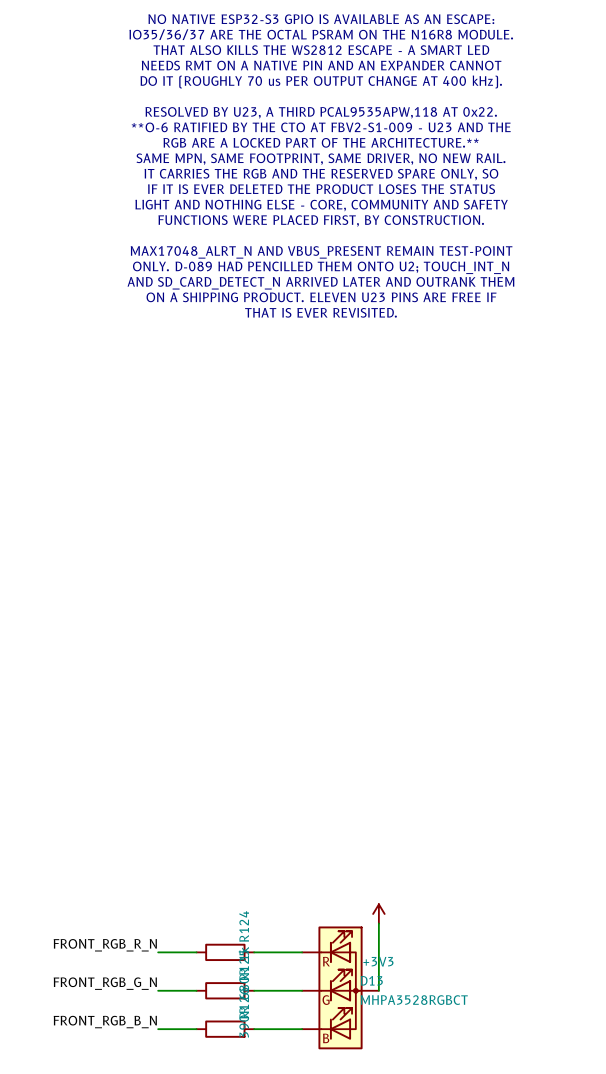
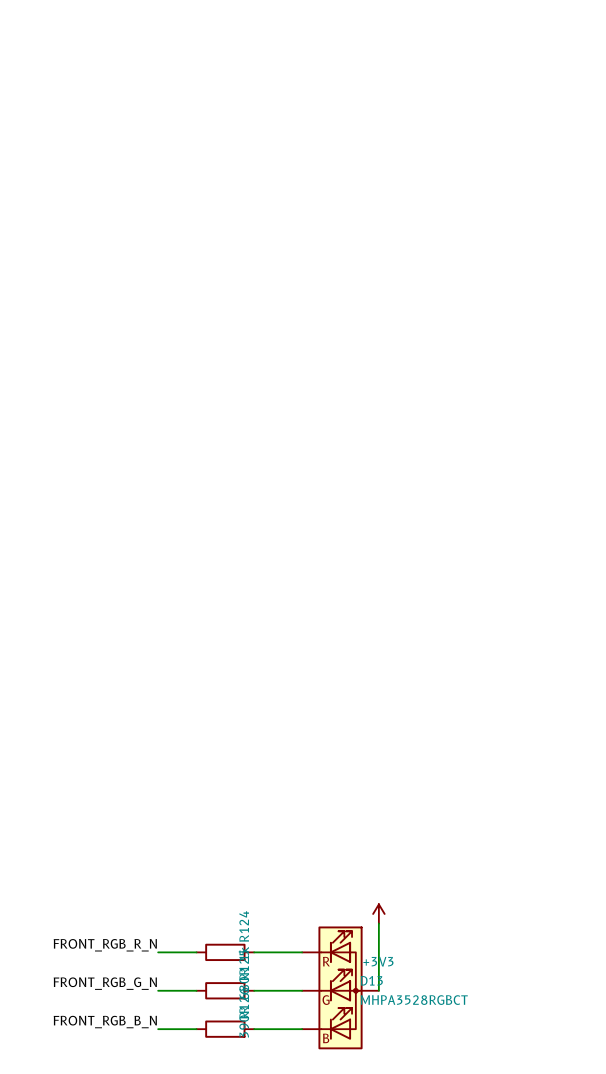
text: NO NATIVE ESP32-S3 GPIO IS AVAILABLE AS AN ESCAPE: (321, 19) -> none
text: IO35/36/37 ARE THE OCTAL PSRAM ON THE N16R8 MODULE. (321, 34) -> none
text: THAT ALSO KILLS THE WS2812 ESCAPE - A SMART LED (321, 50) -> none
text: NEEDS RMT ON A NATIVE PIN AND AN EXPANDER CANNOT (321, 65) -> none
text: DO IT (ROUGHLY 70 us PER OUTPUT CHANGE AT 400 kHz). (321, 81) -> none
text: RESOLVED BY U23, A THIRD PCAL9535APW,118 AT 0x22. (321, 112) -> none
text: **O-6 RATIFIED BY THE CTO AT FBV2-S1-009 - U23 AND THE (321, 127) -> none
text: RGB ARE A LOCKED PART OF THE ARCHITECTURE.** (321, 142) -> none
text: SAME MPN, SAME FOOTPRINT, SAME DRIVER, NO NEW RAIL. (320, 159) -> none
text: IT CARRIES THE RGB AND THE RESERVED SPARE ONLY, SO (321, 174) -> none
text: IF IT IS EVER DELETED THE PRODUCT LOSES THE STATUS (321, 189) -> none
text: LIGHT AND NOTHING ELSE - CORE, COMMUNITY AND SAFETY (321, 205) -> none
text: FUNCTIONS WERE PLACED FIRST, BY CONSTRUCTION. (321, 220) -> none
text: MAX17048_ALRT_N AND VBUS_PRESENT REMAIN TEST-POINT (321, 252) -> none
text: ONLY. D-089 HAD PENCILLED THEM ONTO U2; TOUCH_INT_N (321, 267) -> none
text: AND SD_CARD_DETECT_N ARRIVED LATER AND OUTRANK THEM (320, 283) -> none
text: ON A SHIPPING PRODUCT. ELEVEN U23 PINS ARE FREE IF (321, 297) -> none
text: THAT IS EVER REVISITED. (320, 312) -> none

